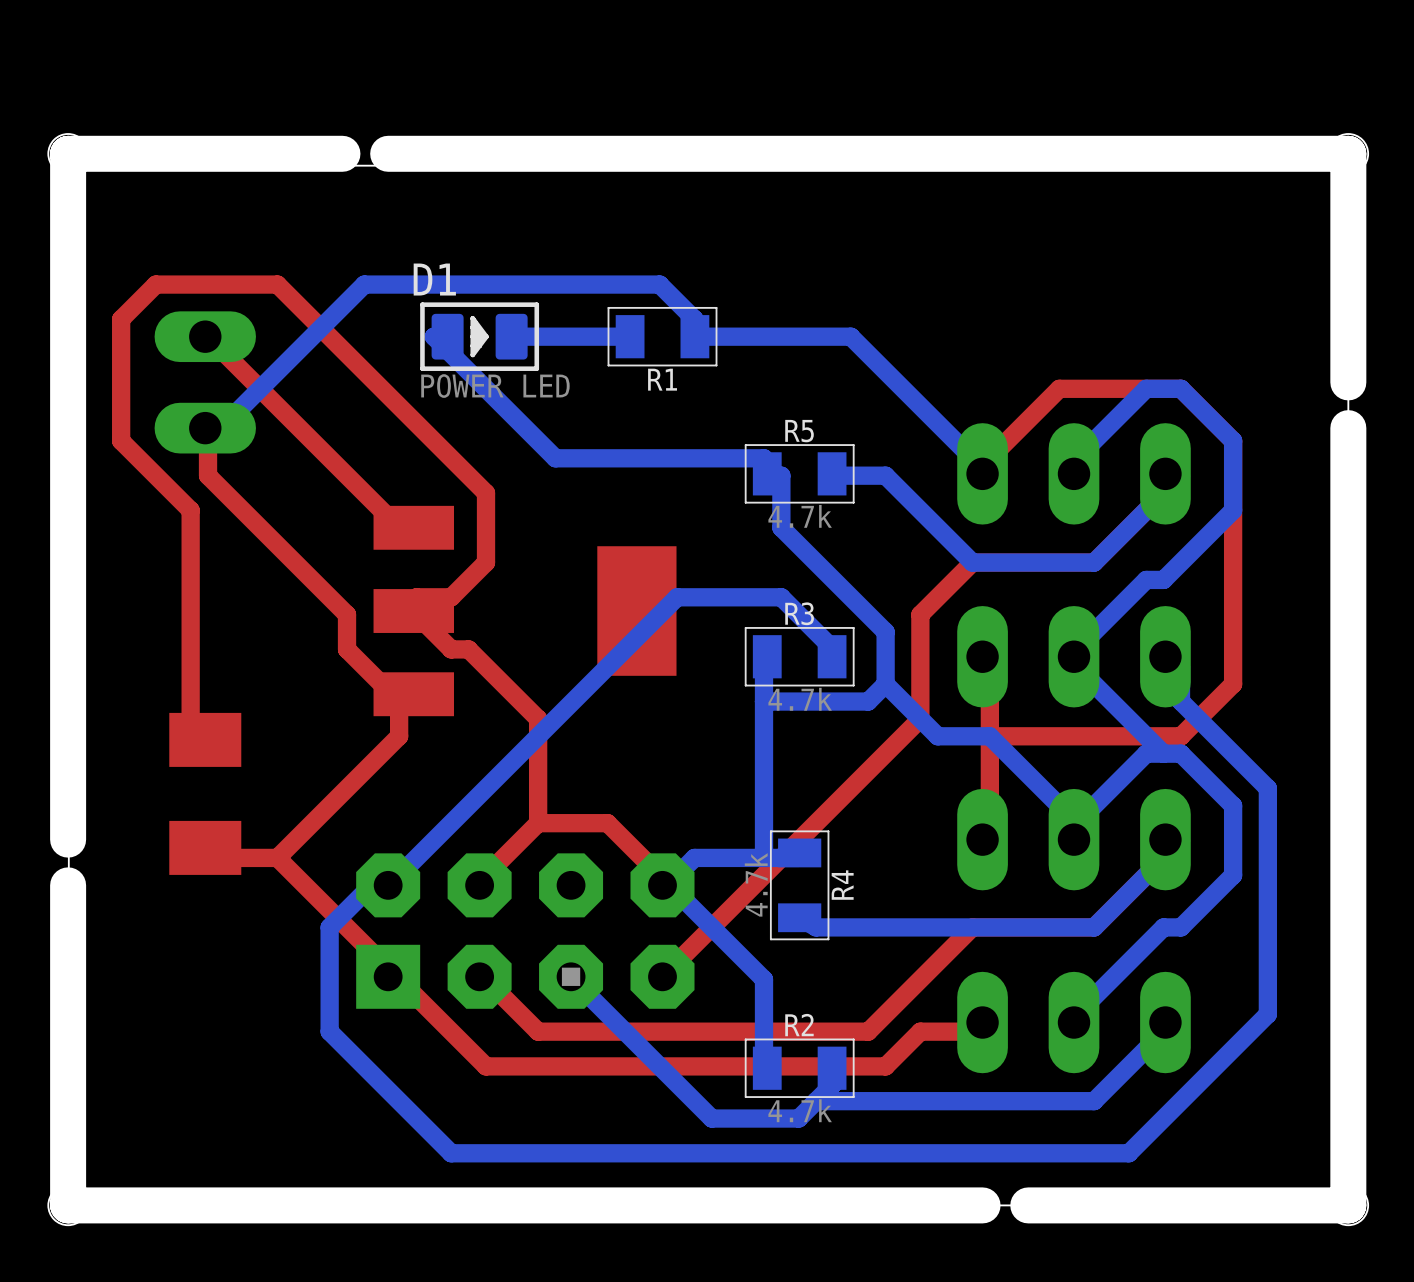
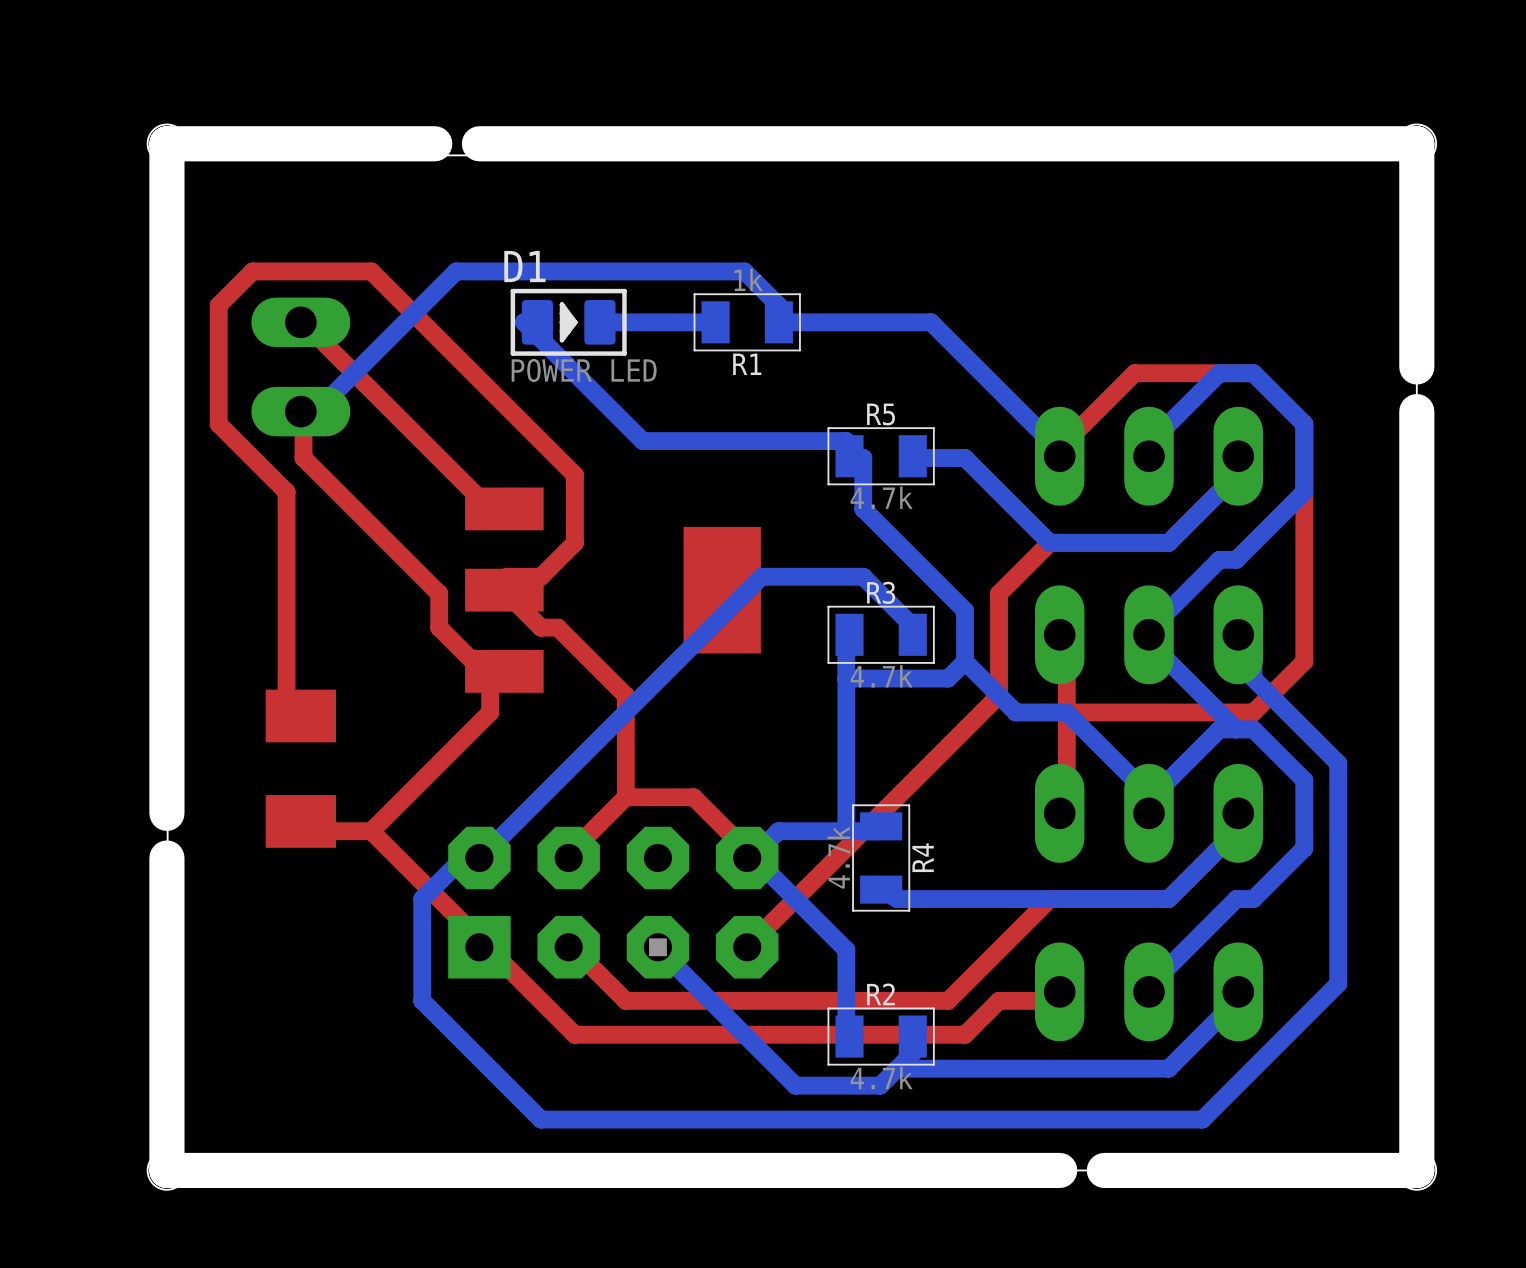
R1 value: none -> 1k (748, 279)

